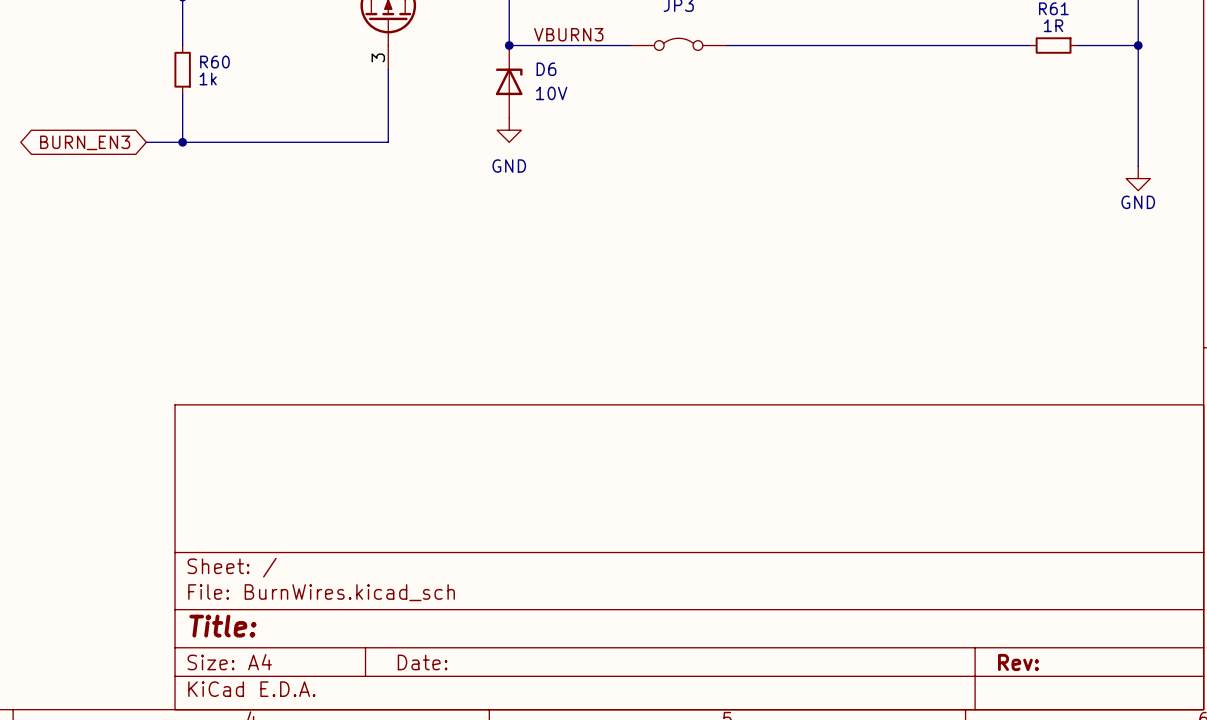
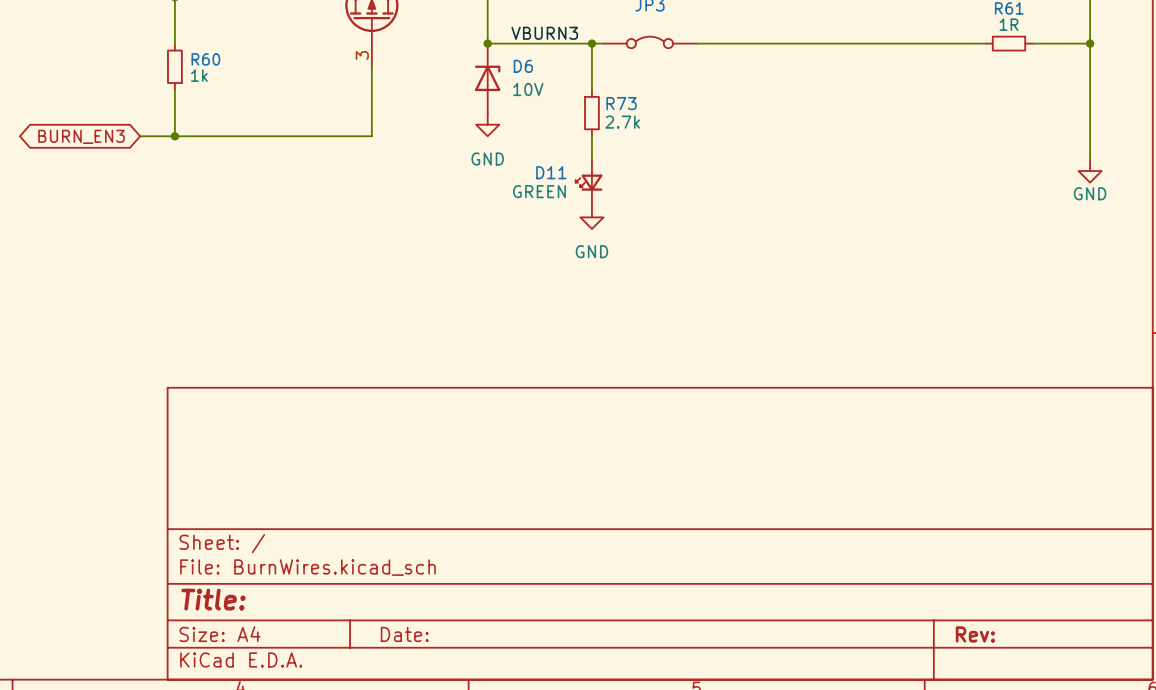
wire: none -> (591, 43) (591, 89)
junction: none -> (591, 43)
R73: none -> 2.7k (591, 113)
wire: none -> (591, 136) (591, 159)
D11: none -> GREEN (589, 182)
power symbol: none -> GND (591, 217)

